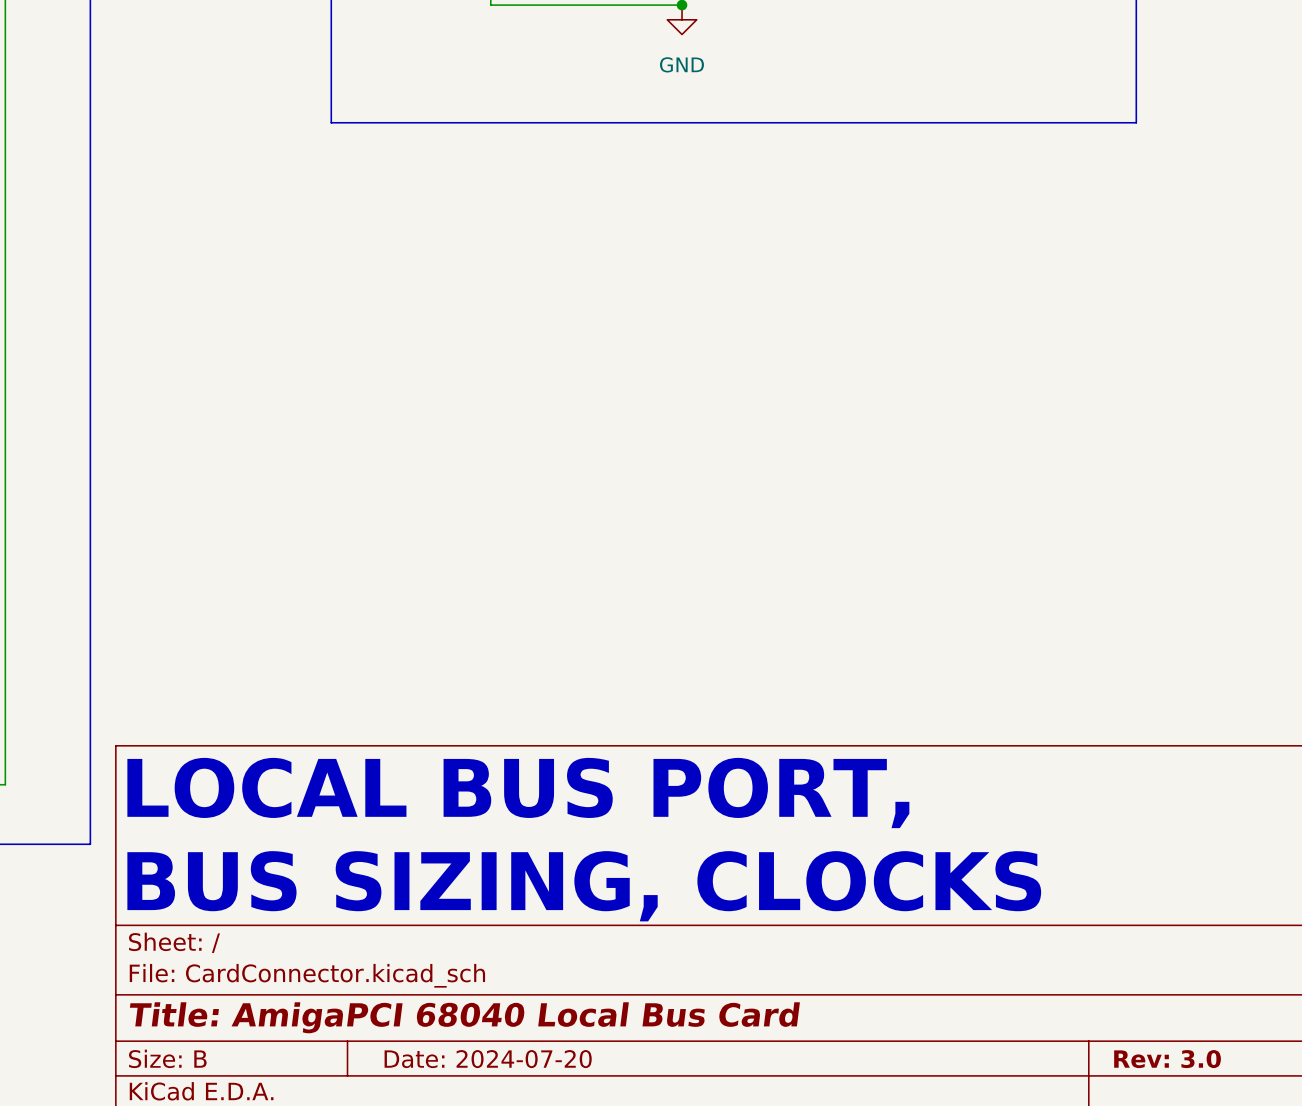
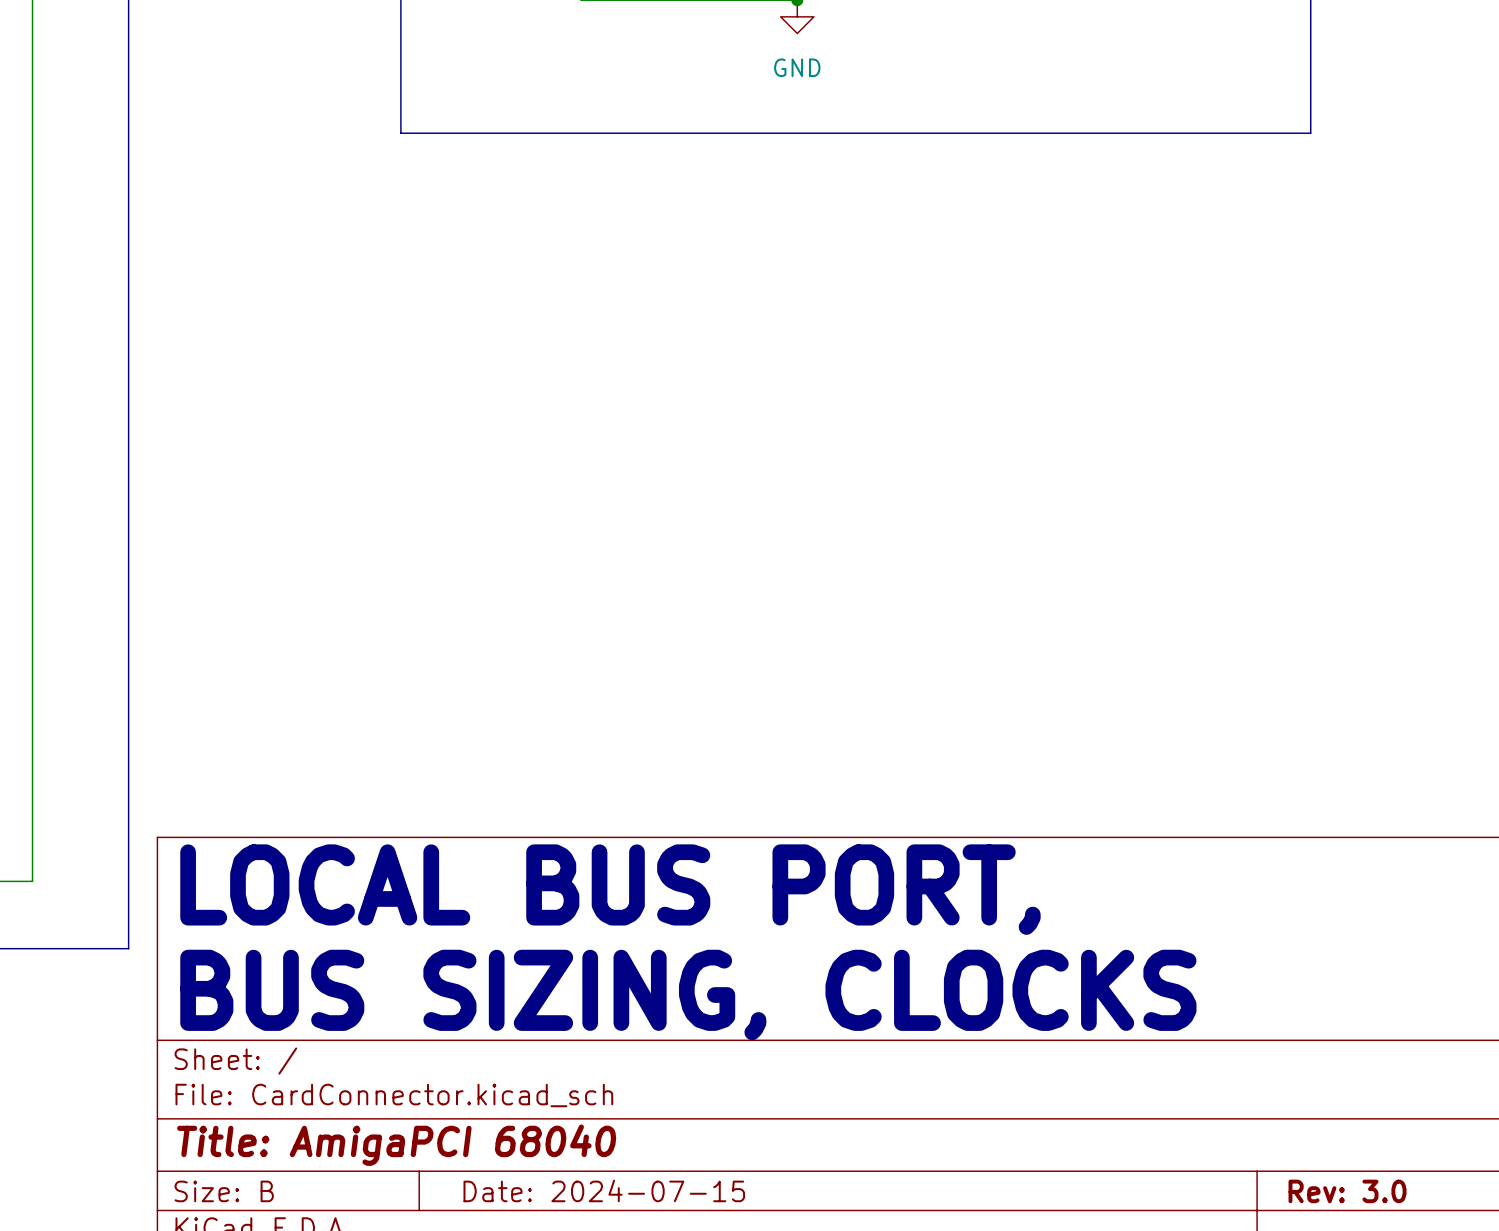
title block: Title: AmigaPCI 68040 Local Bus Card (464, 1017) -> Title: AmigaPCI 68040 (396, 1145)
title block: Date: 2024-07-20 (488, 1059) -> Date: 2024-07-15 (604, 1190)

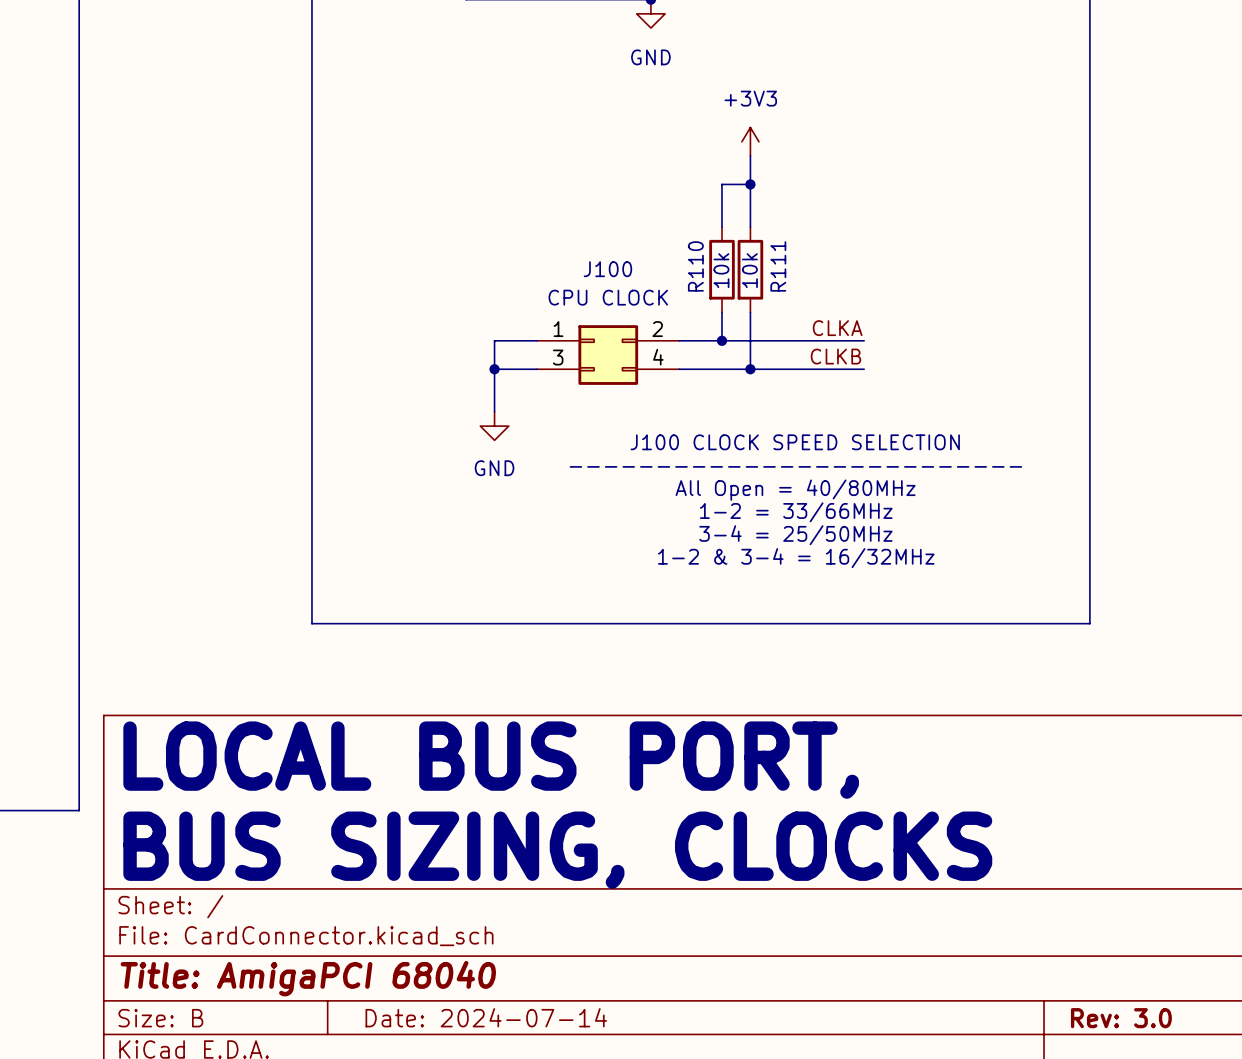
line: (400, 133) (1310, 133) -> (311, 113) (311, 623) (1089, 623) (1089, 113)
power symbol: none -> +3V3 (750, 141)
wire: none -> (750, 156) (750, 227)
wire: none -> (750, 184) (721, 184) (721, 227)
junction: none -> (750, 184)
R110: none -> 10k (721, 269)
R111: none -> 10k (750, 269)
wire: none -> (721, 312) (721, 340)
wire: none -> (750, 312) (750, 369)
label: none -> CLKA (837, 328)
wire: none -> (537, 340) (494, 340) (494, 411)
wire: none -> (679, 340) (864, 340)
junction: none -> (721, 340)
J100: none -> CPU CLOCK (608, 355)
label: none -> CLKB (835, 356)
wire: none -> (494, 369) (537, 369)
junction: none -> (494, 369)
wire: none -> (679, 369) (864, 369)
junction: none -> (750, 369)
power symbol: none -> GND (494, 426)
text: none -> J100 CLOCK SPEED SELECTION (795, 442)
text: none -> -------------------------- (795, 466)
text: none -> All Open = 40/80MHz (795, 490)
text: none -> 1-2 = 33/66MHz (796, 512)
text: none -> 3-4 = 25/50MHz (795, 535)
text: none -> 1-2 & 3-4 = 16/32MHz (796, 558)
title block: Date: 2024-07-15 (604, 1190) -> Date: 2024-07-14 (486, 1017)

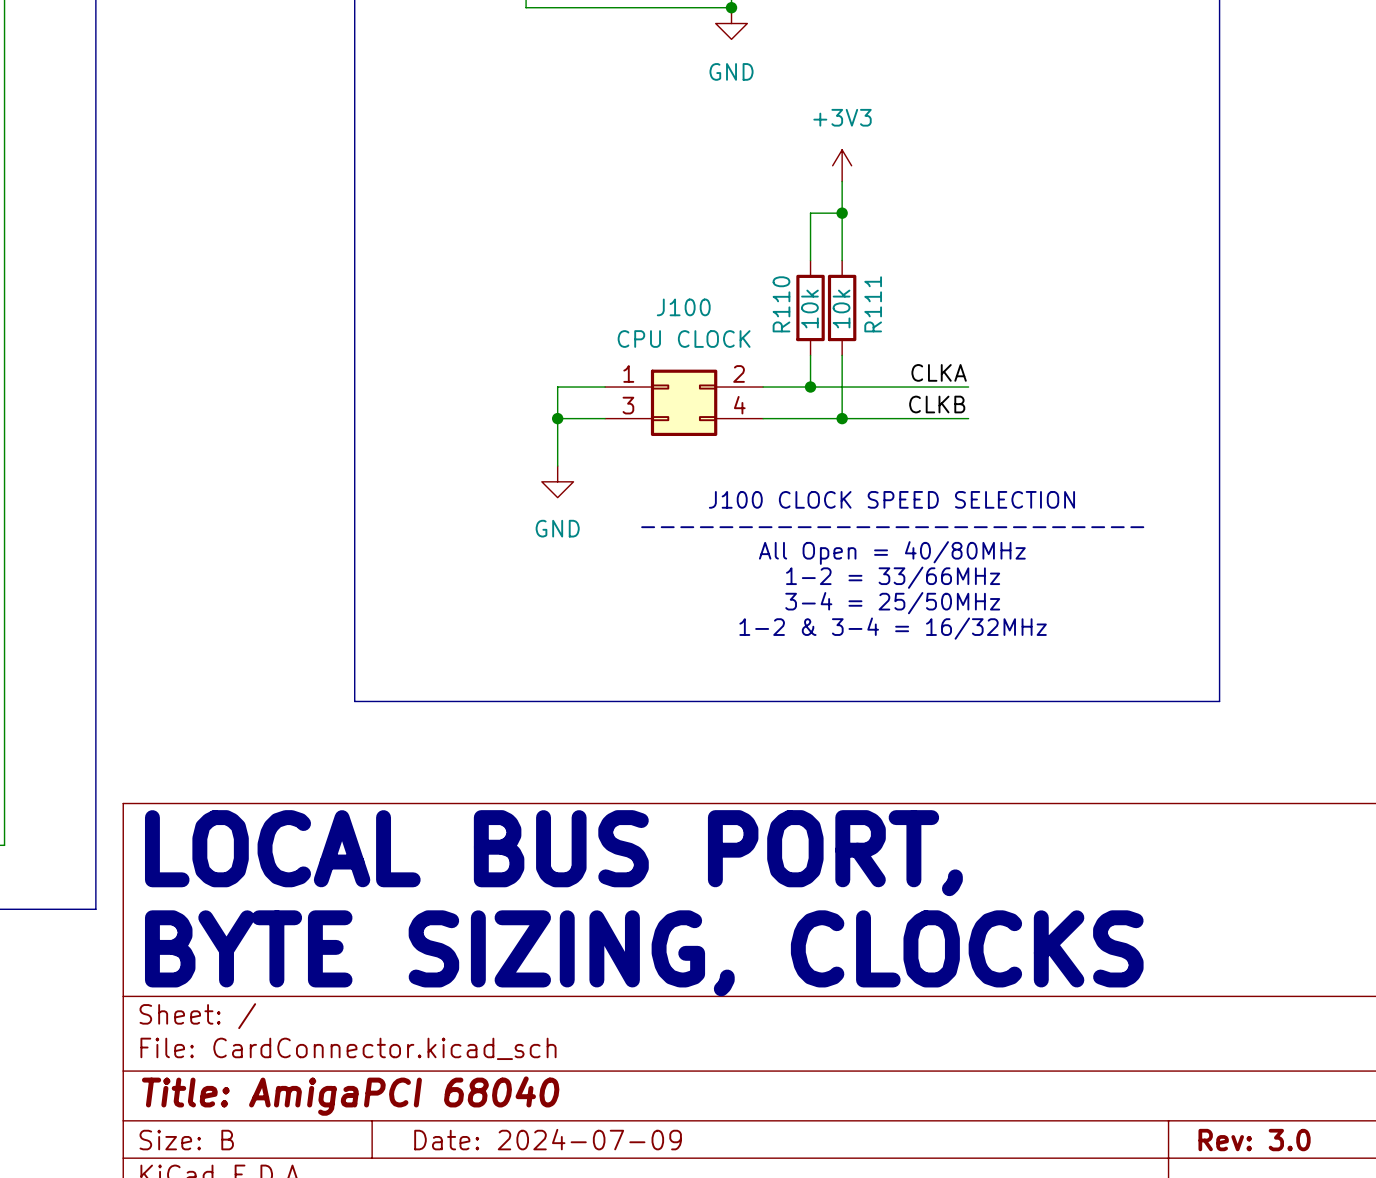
text: BUS SIZING, CLOCKS (557, 850) -> BYTE SIZING, CLOCKS (644, 953)
title block: Date: 2024-07-14 (486, 1017) -> Date: 2024-07-09 (548, 1139)

